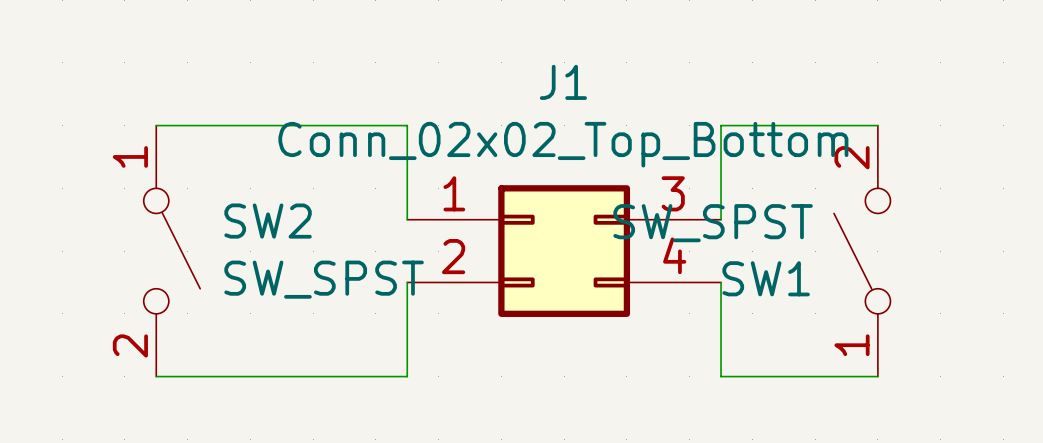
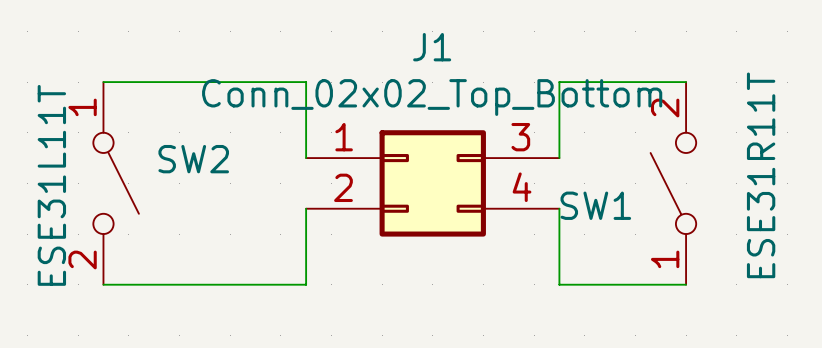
SW1 value: SW_SPST (713, 223) -> ESE31R11T (761, 175)
SW2 value: SW_SPST (324, 279) -> ESE31L11T (51, 185)

